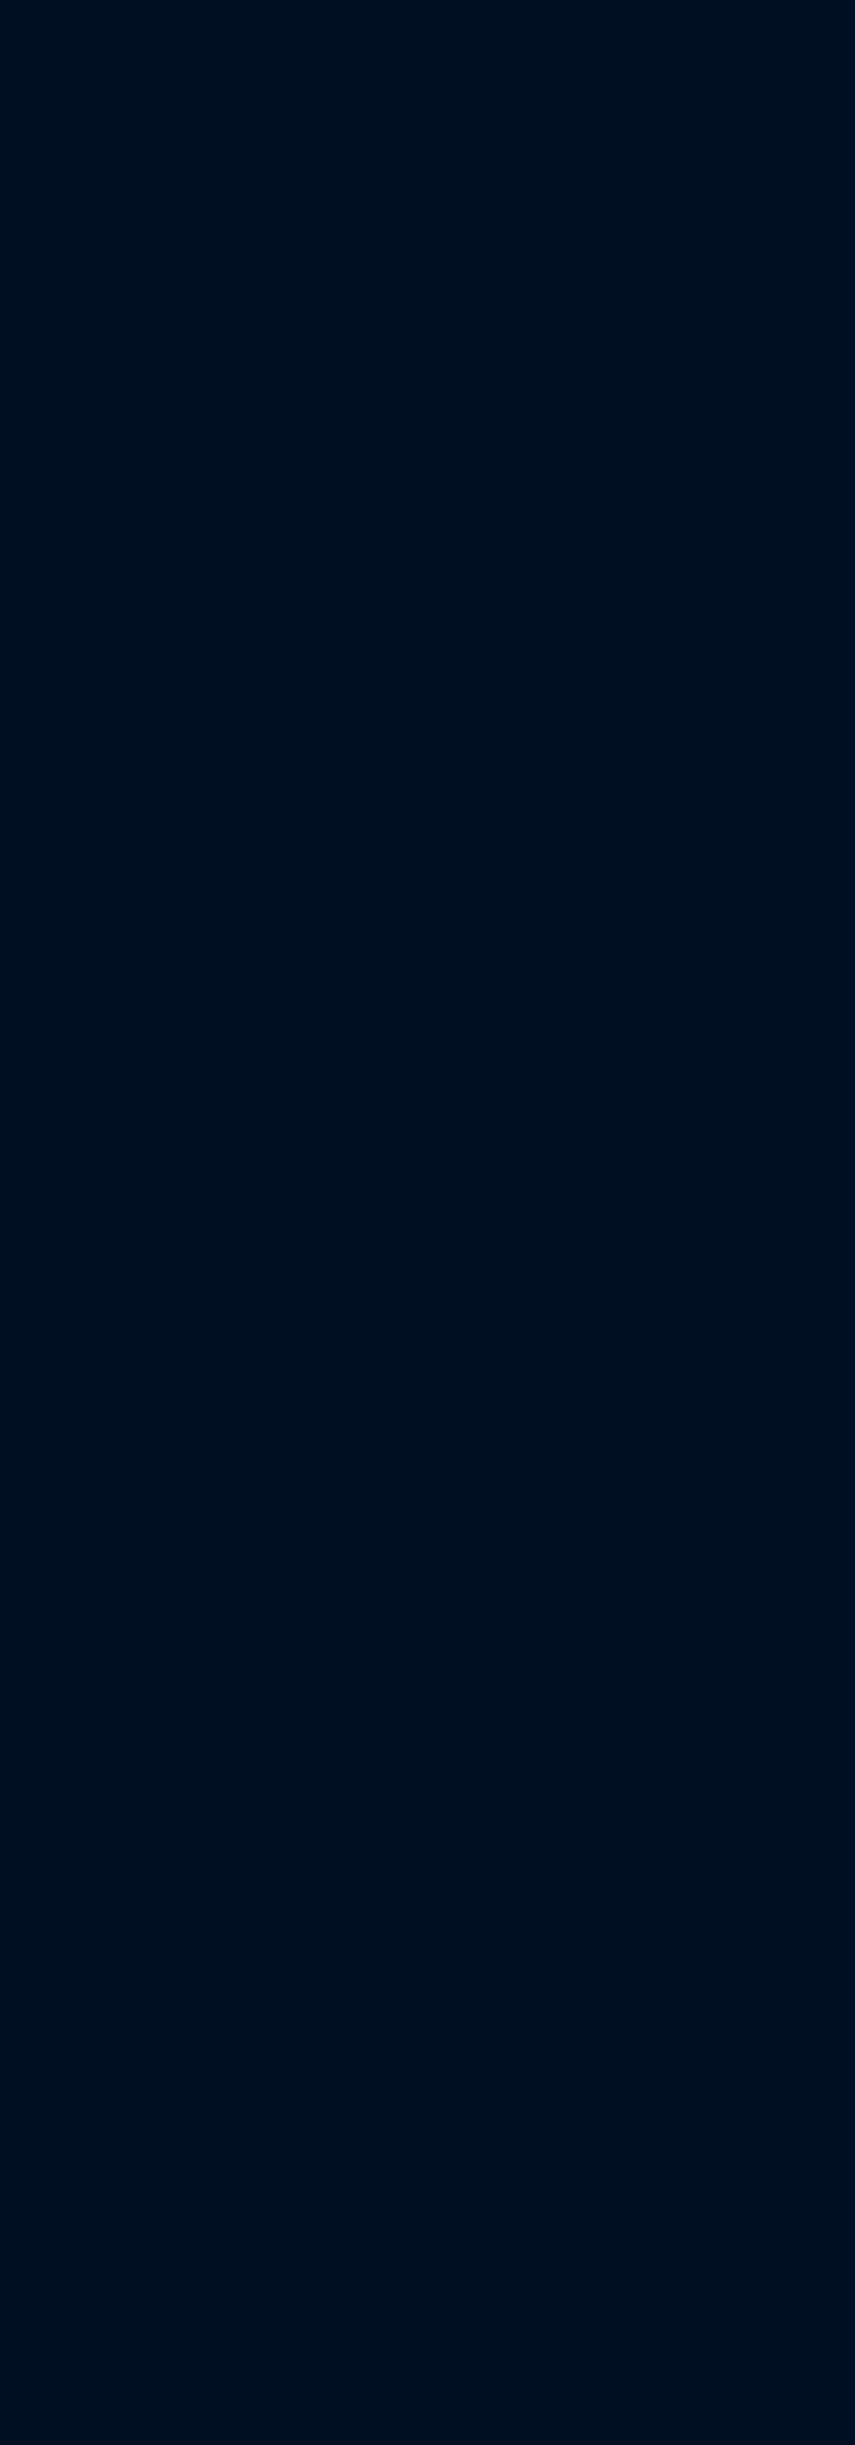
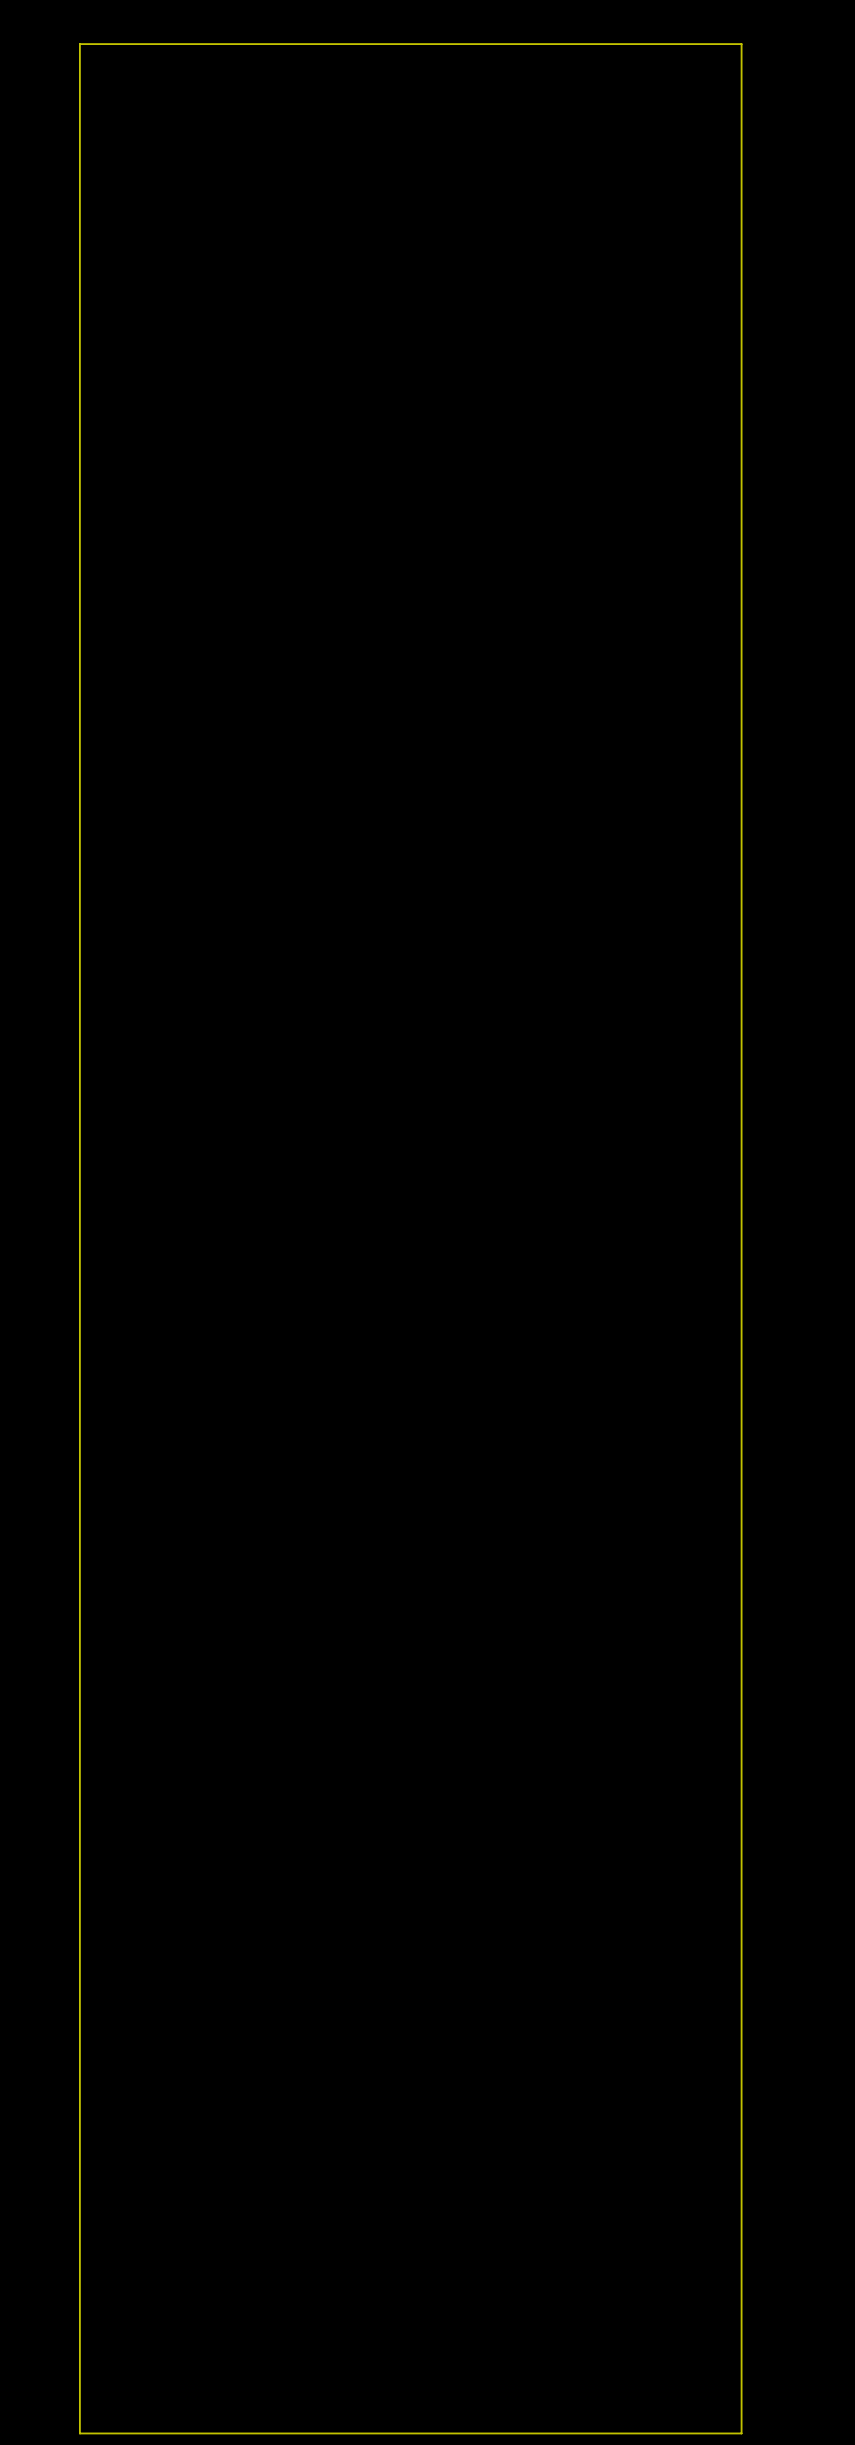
board edge: none -> (741, 44) (79, 44) (79, 2433) (741, 2433) (741, 44)

